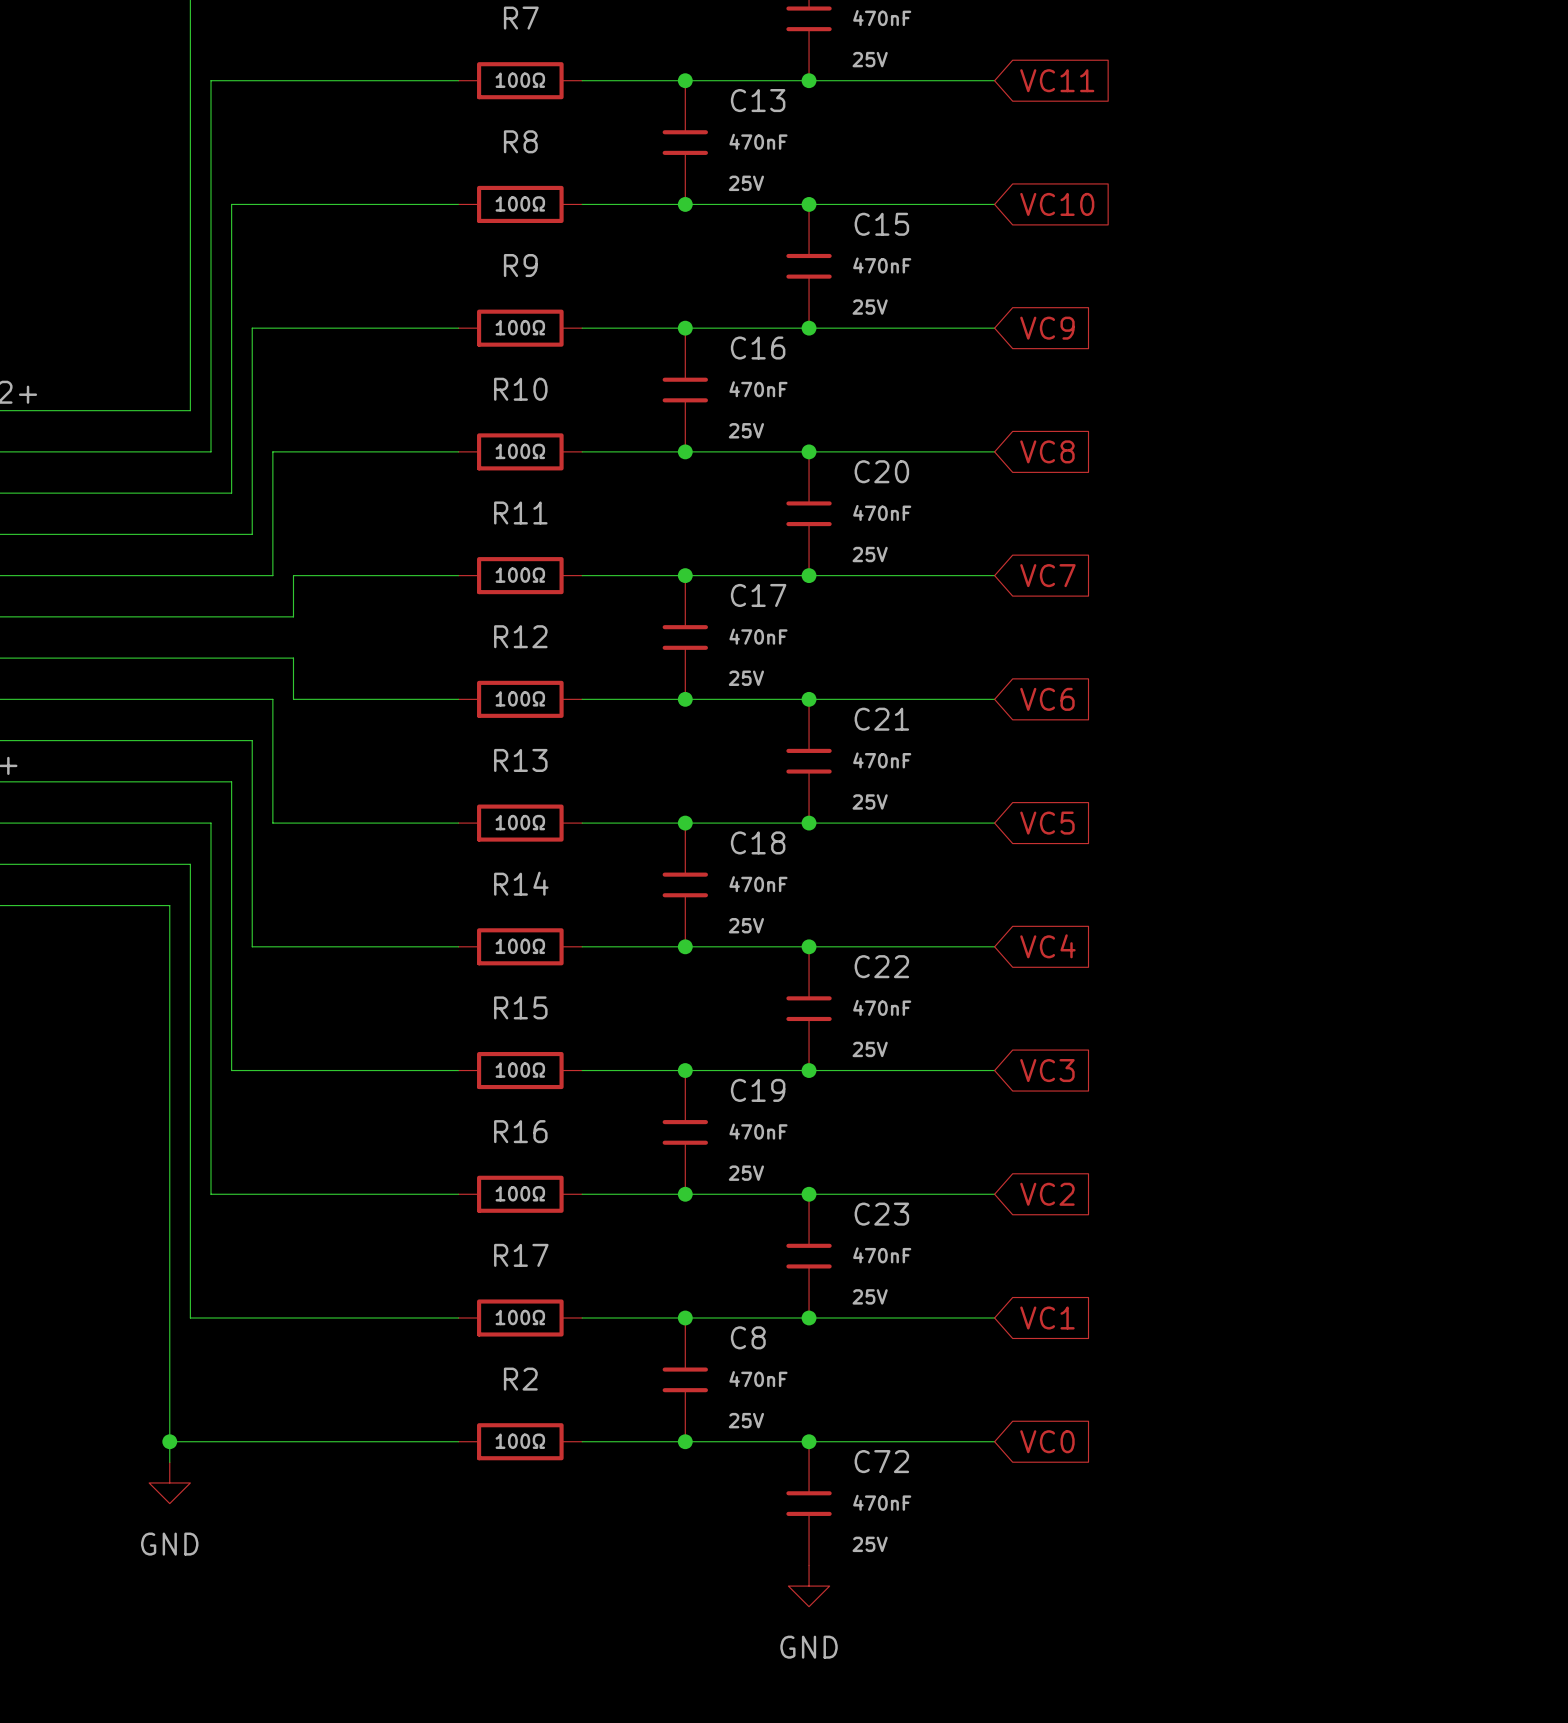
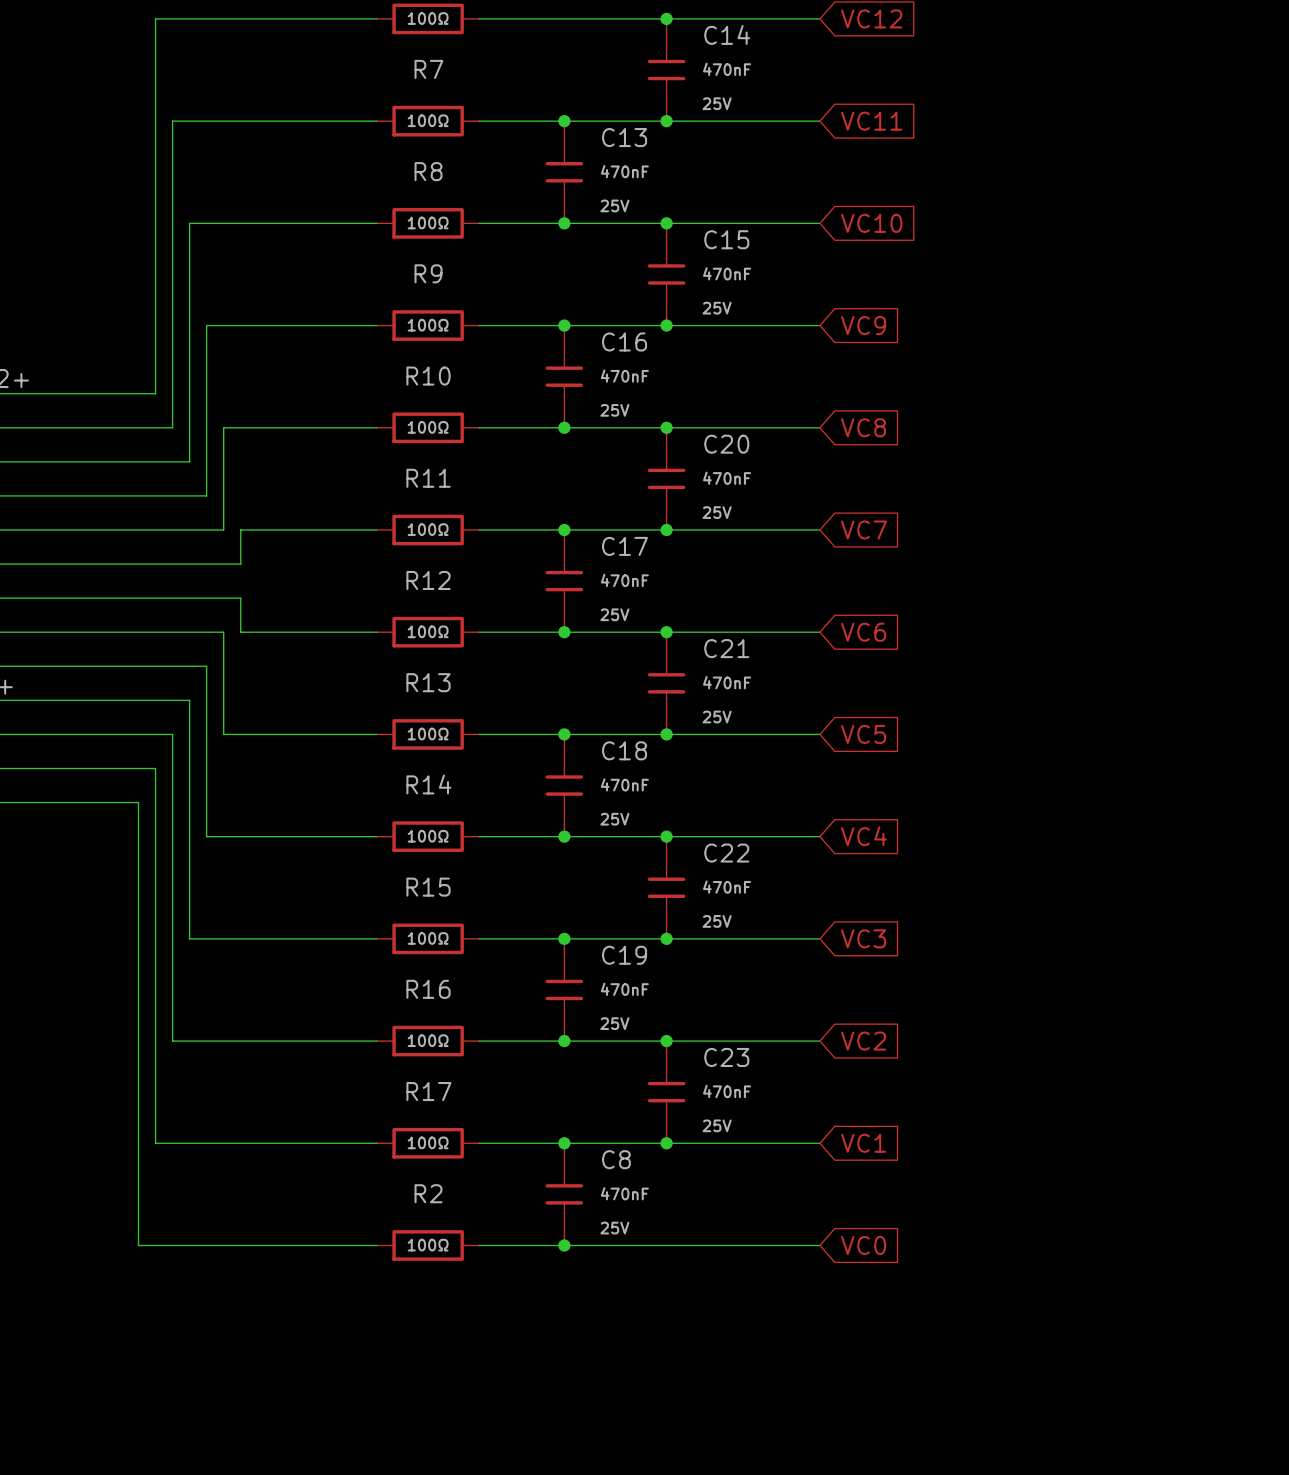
wire: (169, 1441) (169, 1462) -> none
junction: (169, 1441) -> none
junction: (809, 1441) -> none
power symbol: GND (169, 1482) -> none
C72: 470nF (809, 1503) -> none
power symbol: GND (809, 1586) -> none

